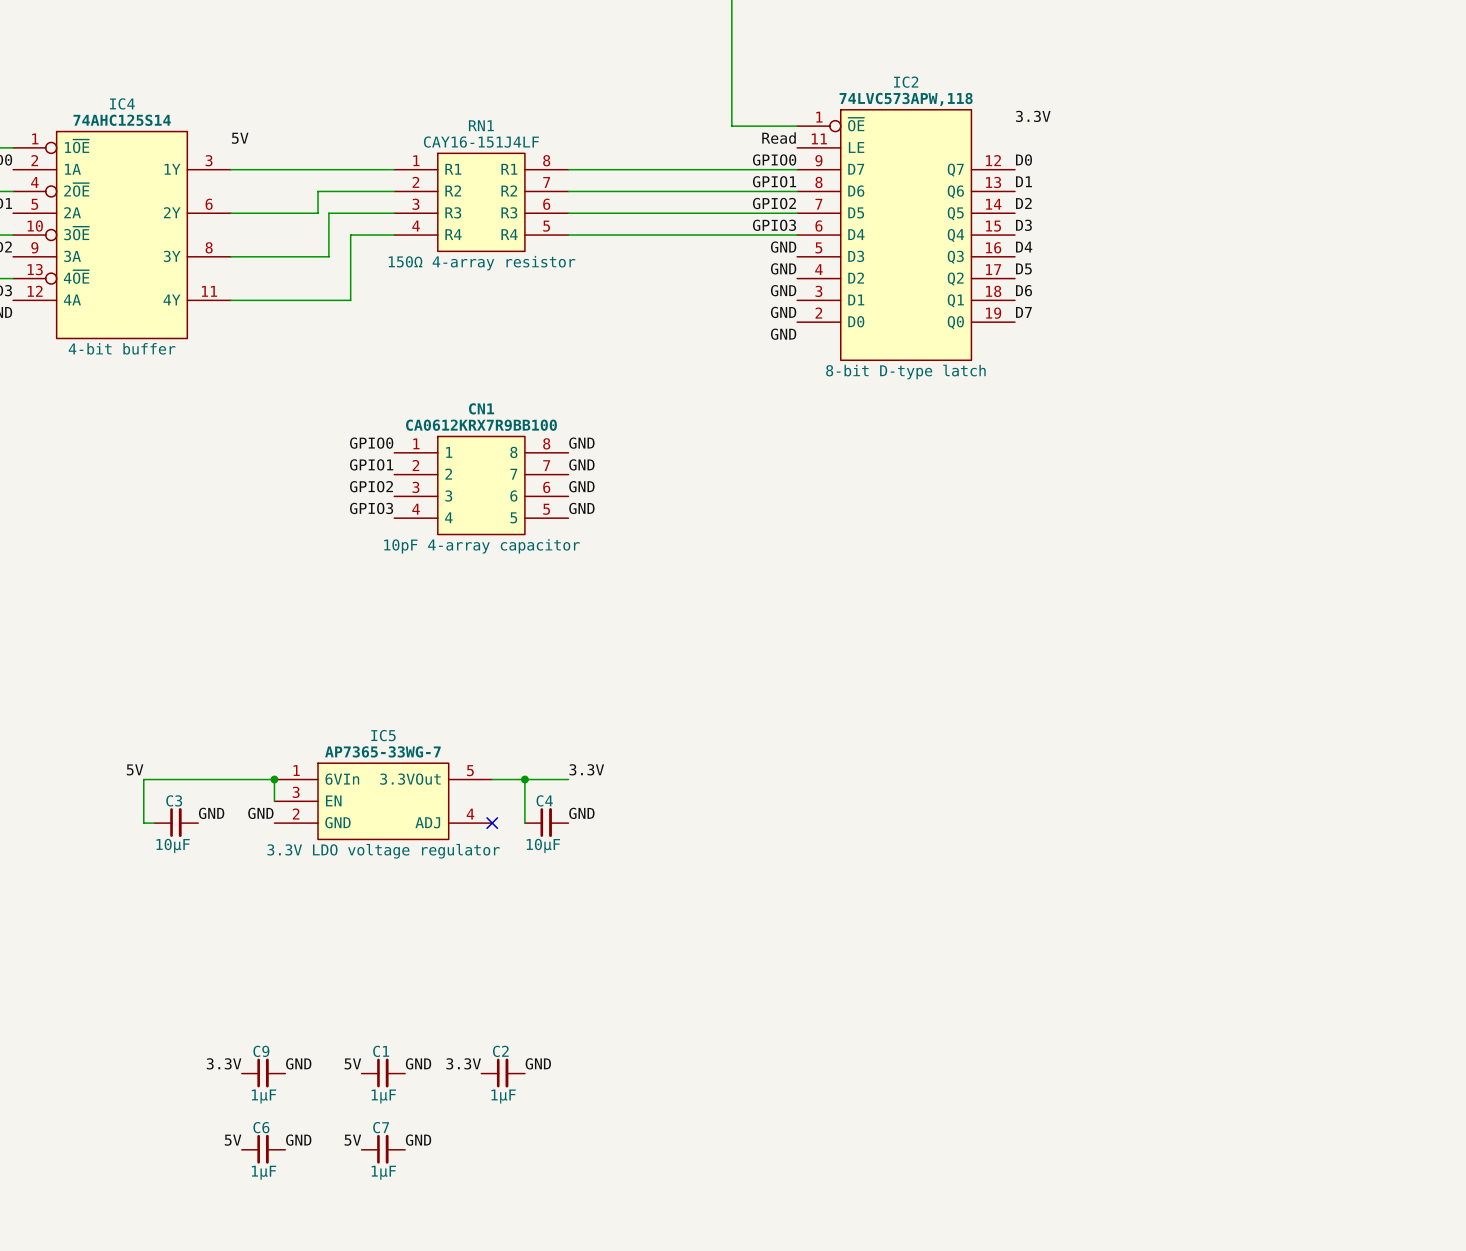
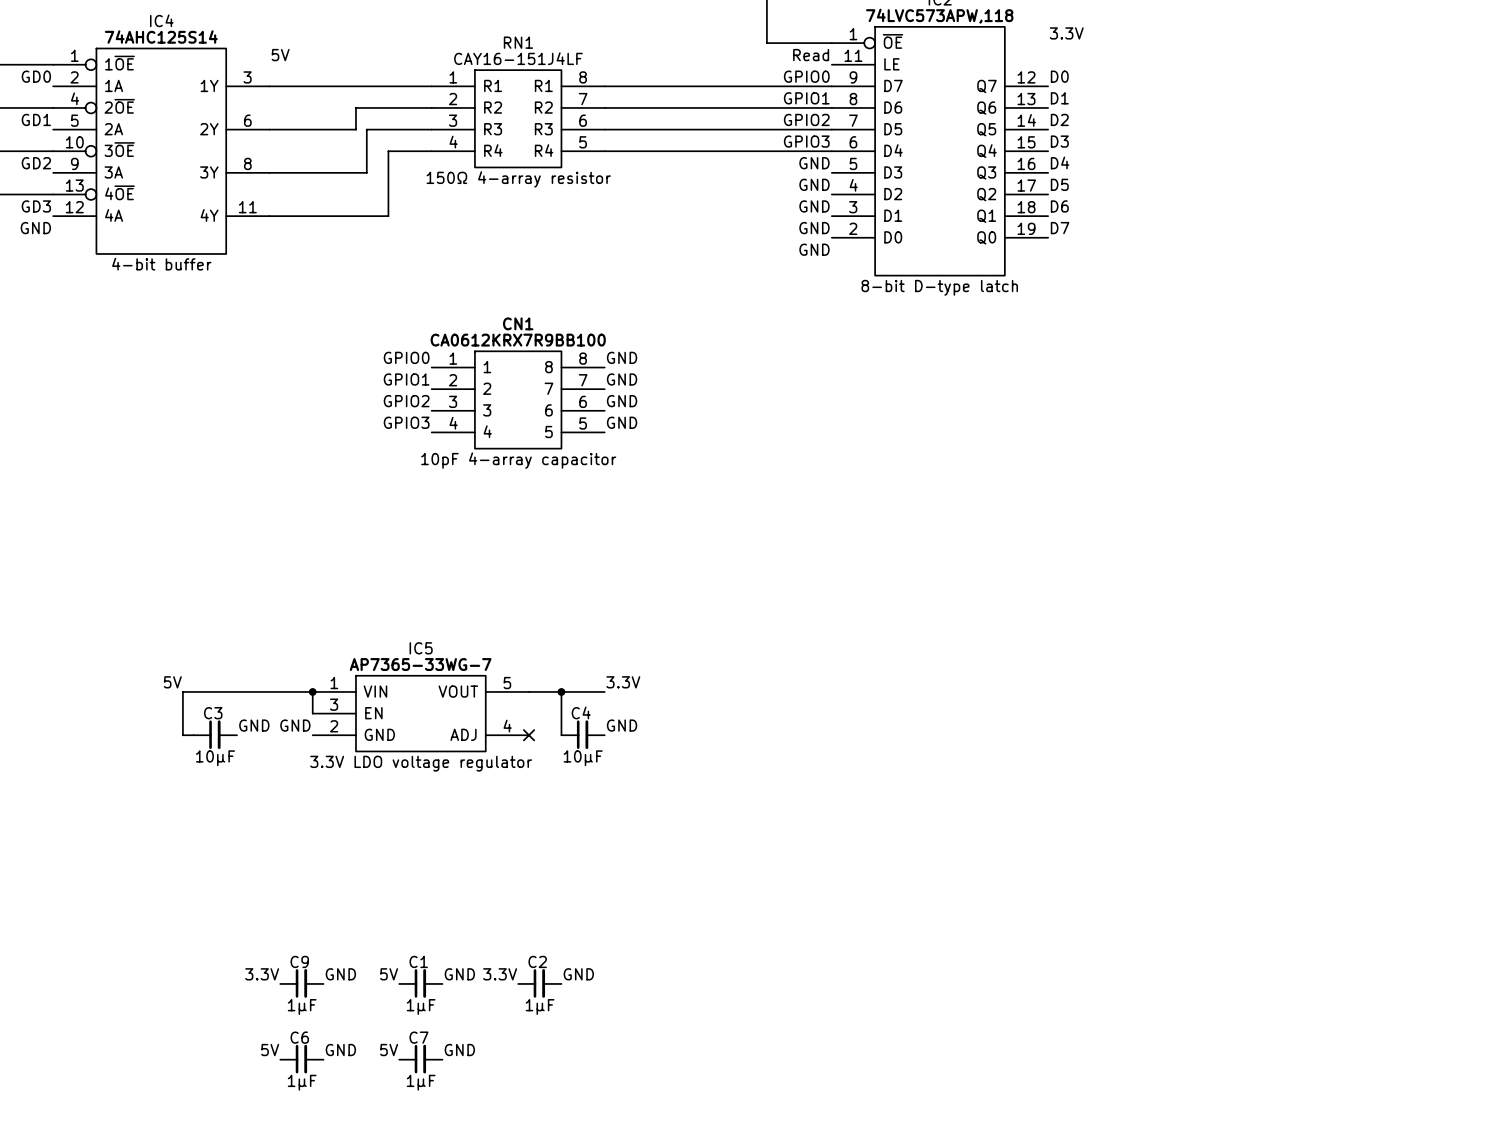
IC5 pin name: 6VIn (342, 779) -> VIN (375, 691)
IC5 pin name: 3.3VOut (410, 779) -> VOUT (458, 691)

